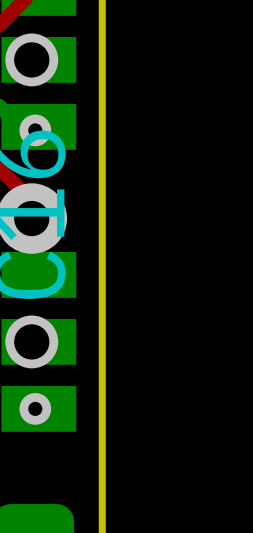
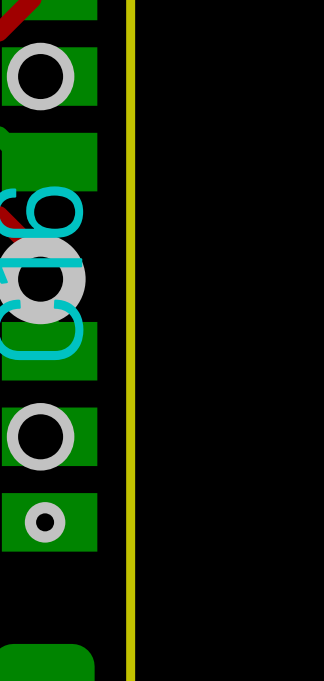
via: (35, 130) -> none

